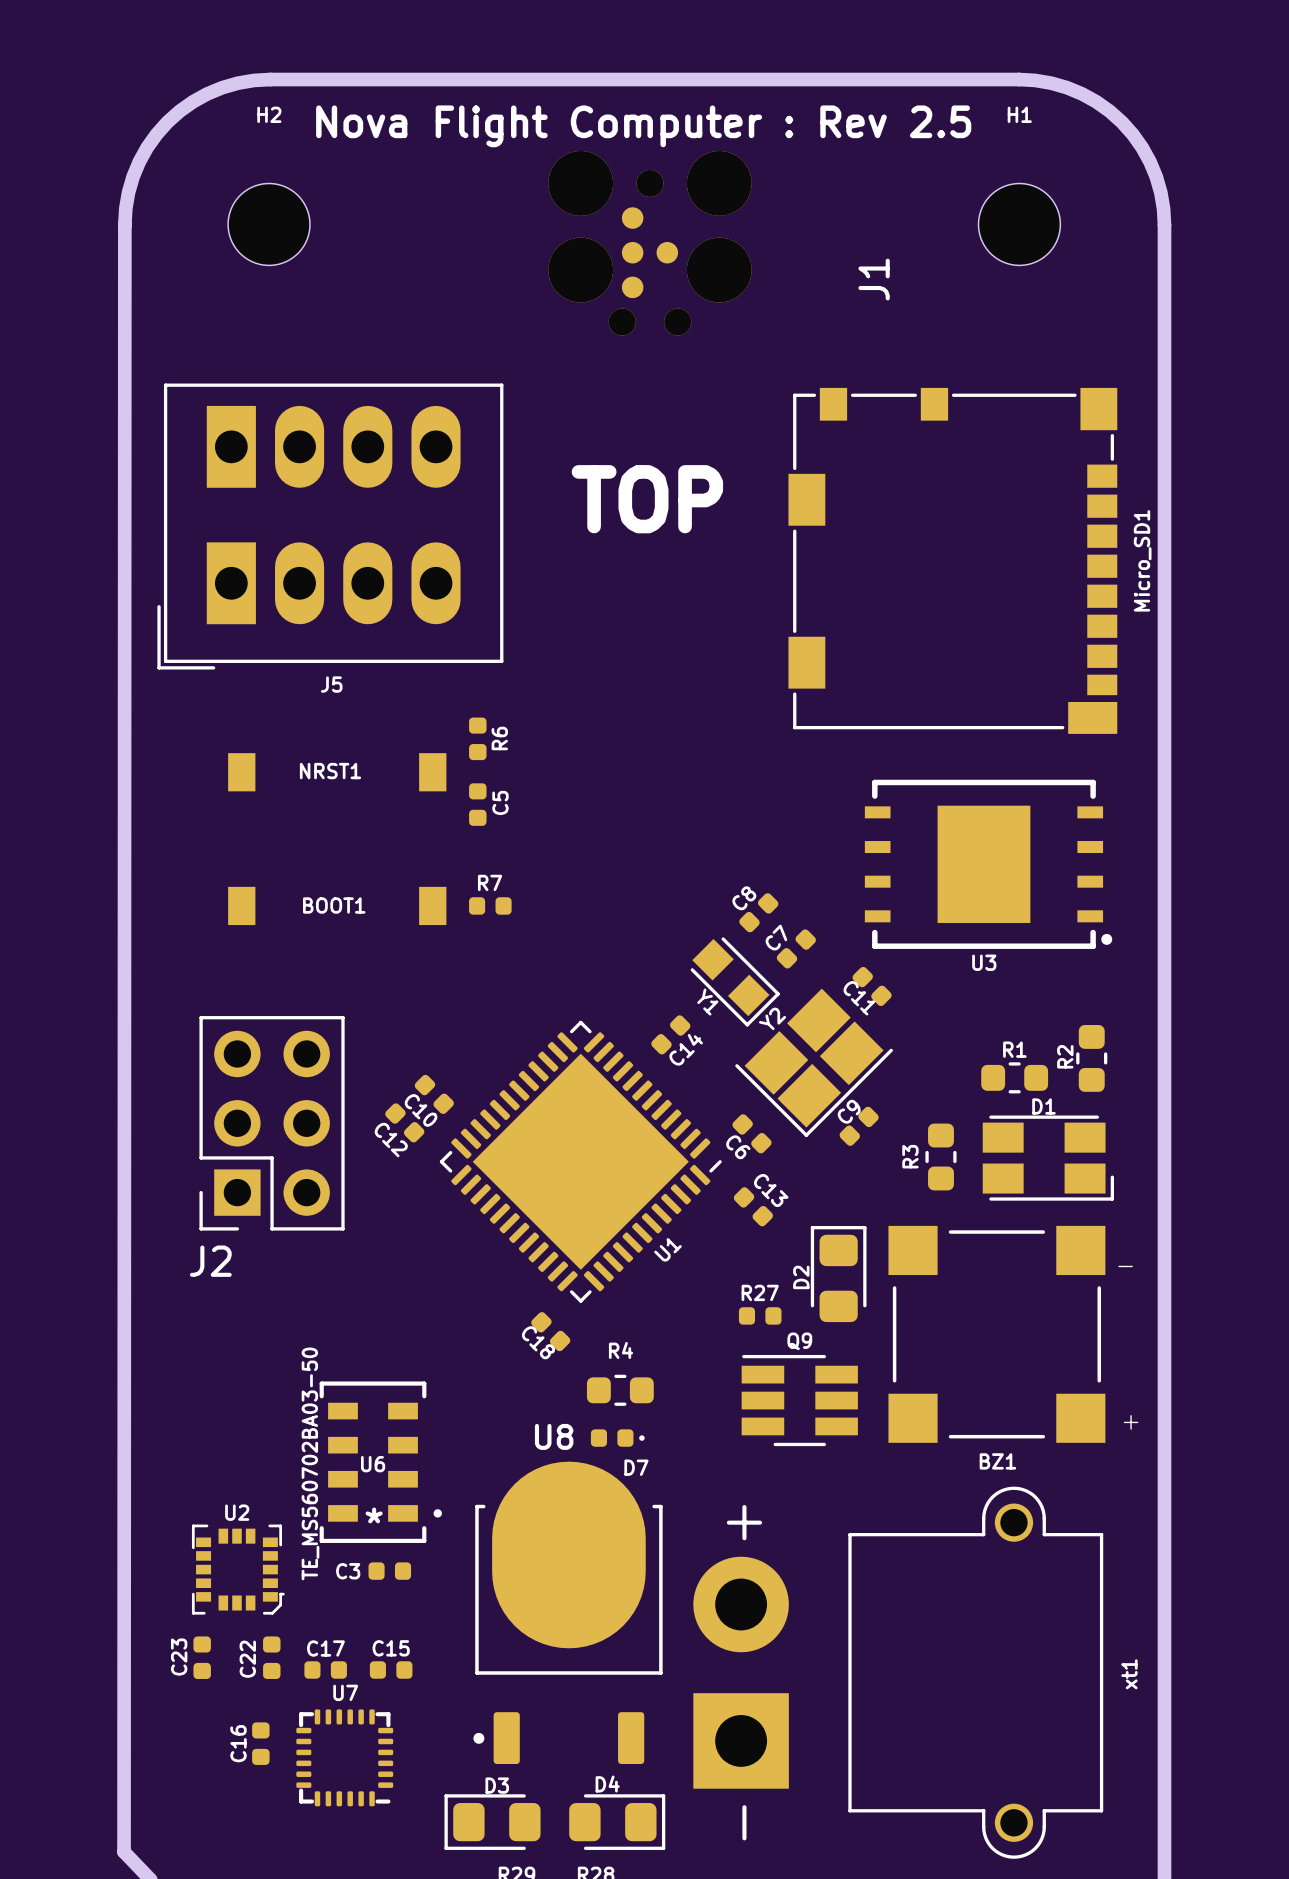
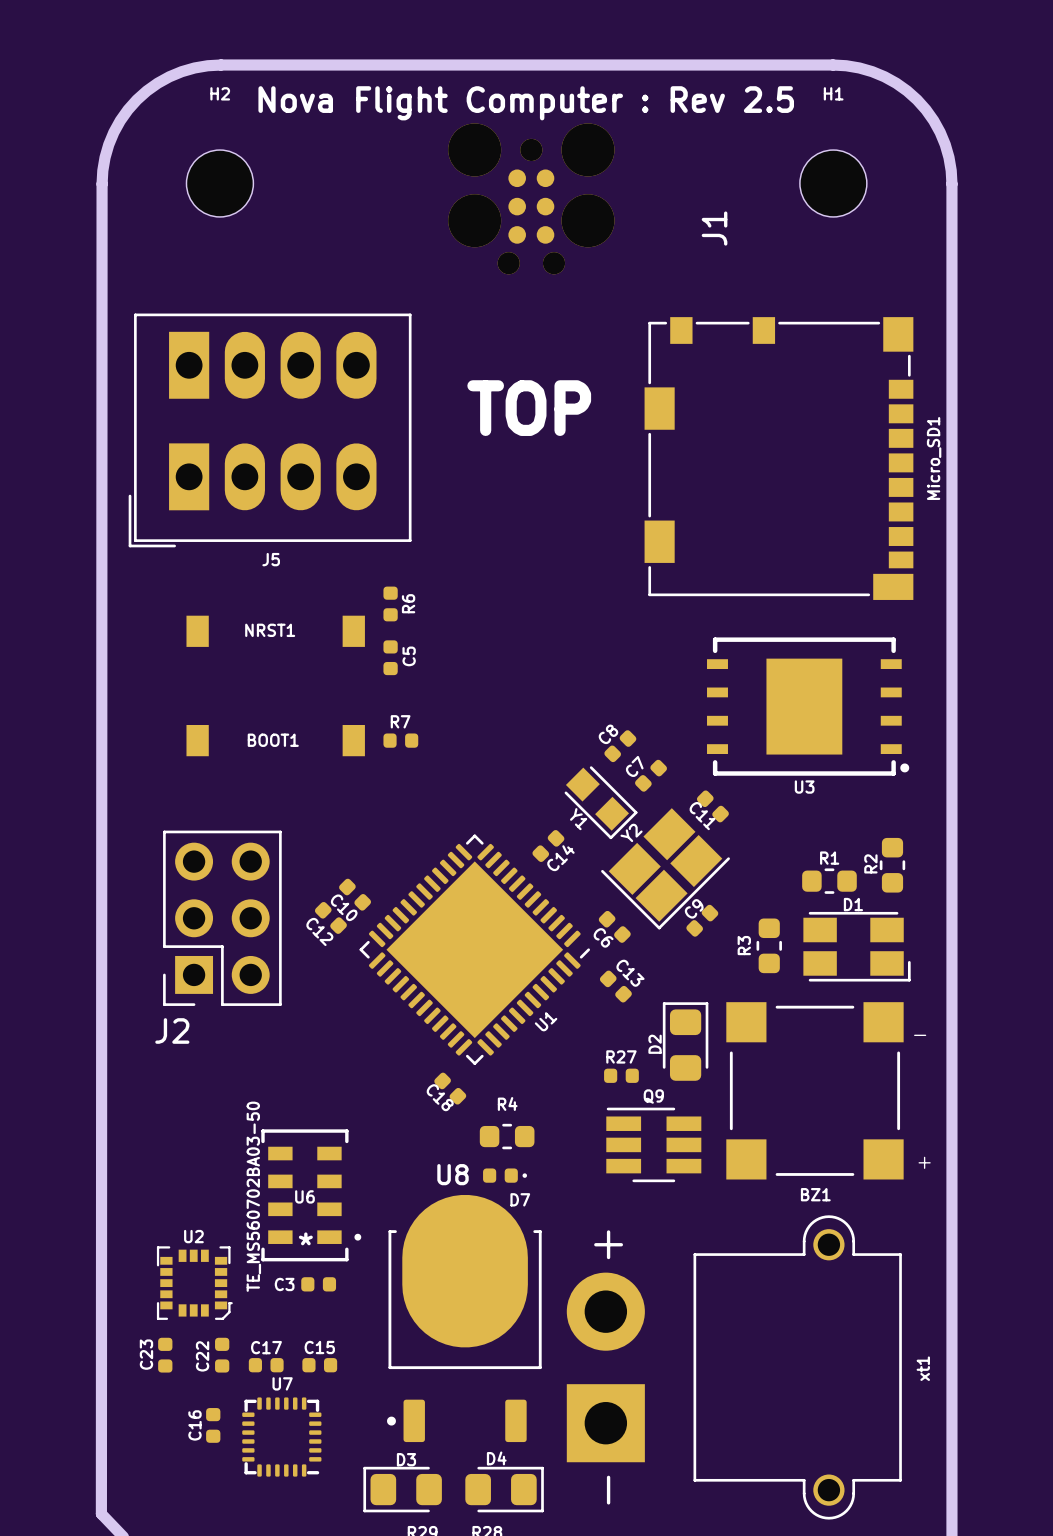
J1 footprint: [548, 151, 752, 336] -> [448, 123, 615, 275]

